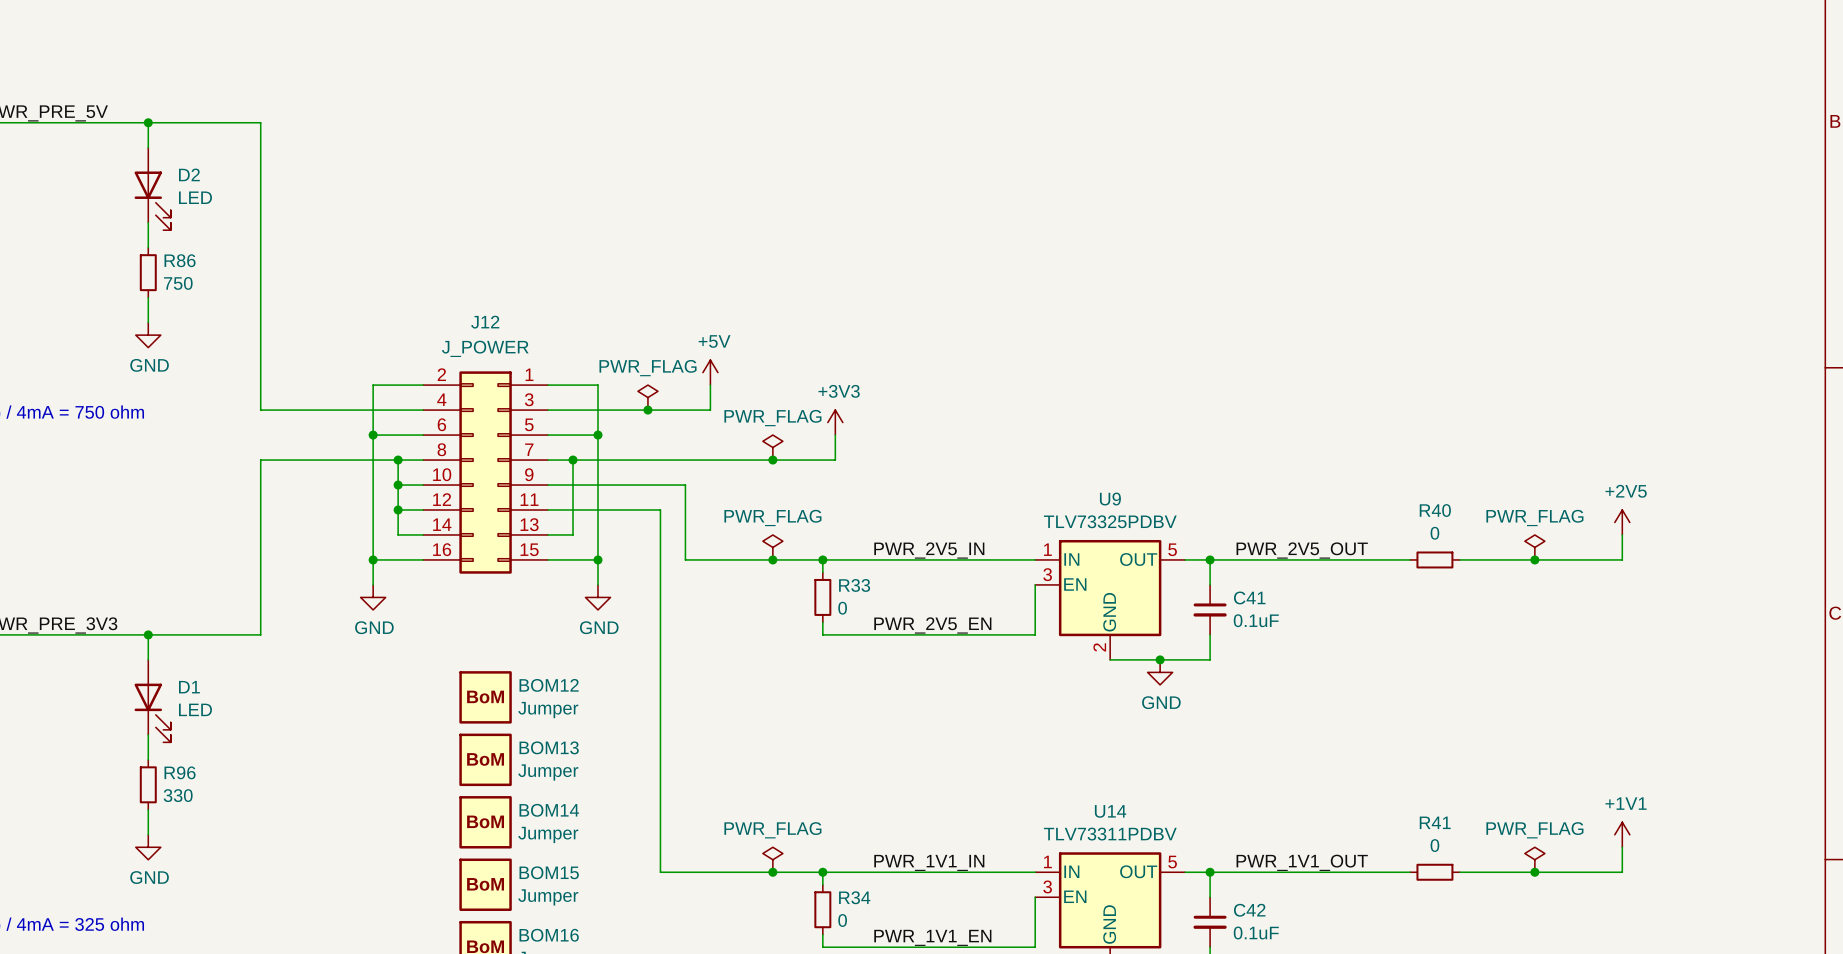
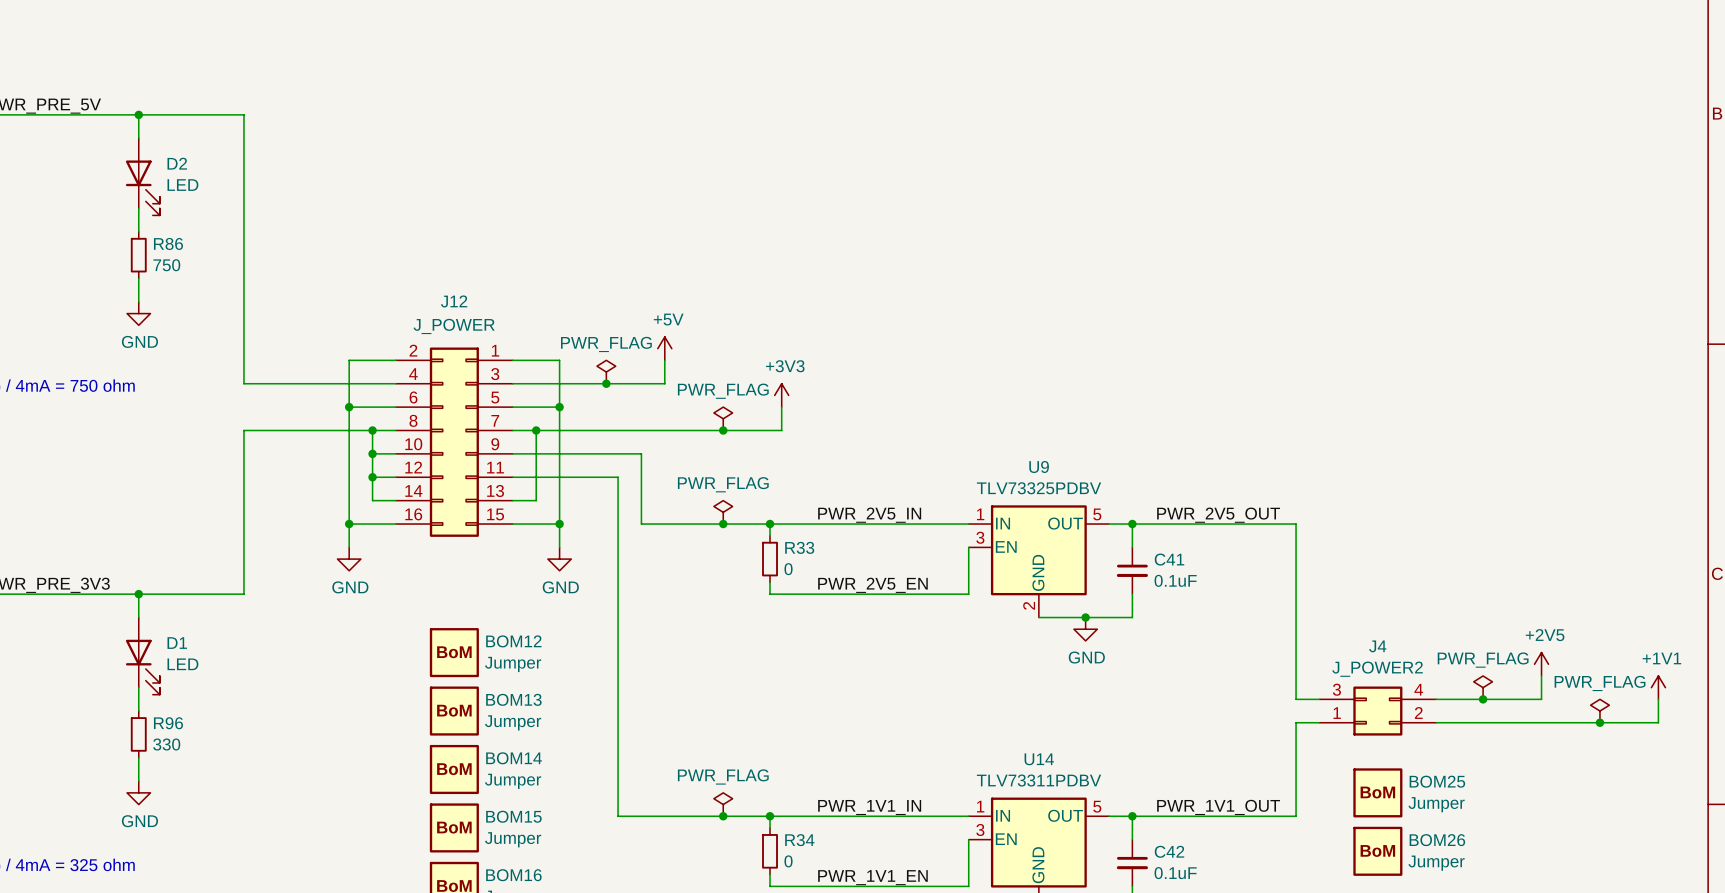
power symbol position: +2V5 (1622, 522) -> +2V5 (1541, 664)
wire: (1622, 534) (1622, 559) (1459, 559) -> none
power symbol: PWR_FLAG (1534, 547) -> none
wire: (1384, 559) (1409, 559) -> (1296, 524) (1296, 699) (1319, 699)
R40: 0 (1434, 559) -> none
junction: (1534, 559) -> none
wire: none -> (1541, 675) (1541, 699) (1436, 699)
power symbol: none -> PWR_FLAG (1483, 687)
junction: none -> (1483, 699)
wire: none -> (1658, 699) (1658, 722) (1436, 722)
J4: none -> J_POWER2 (1377, 711)
power symbol: none -> PWR_FLAG (1599, 711)
junction: none -> (1599, 722)
power symbol position: +1V1 (1622, 834) -> +1V1 (1658, 687)
BOM25: none -> Jumper (1377, 792)
wire: (1622, 847) (1622, 872) (1459, 872) -> none
power symbol: PWR_FLAG (1534, 859) -> none
wire: (1384, 872) (1409, 872) -> (1296, 816) (1296, 722) (1319, 722)
R41: 0 (1434, 872) -> none
junction: (1534, 872) -> none
BOM26: none -> Jumper (1377, 851)

